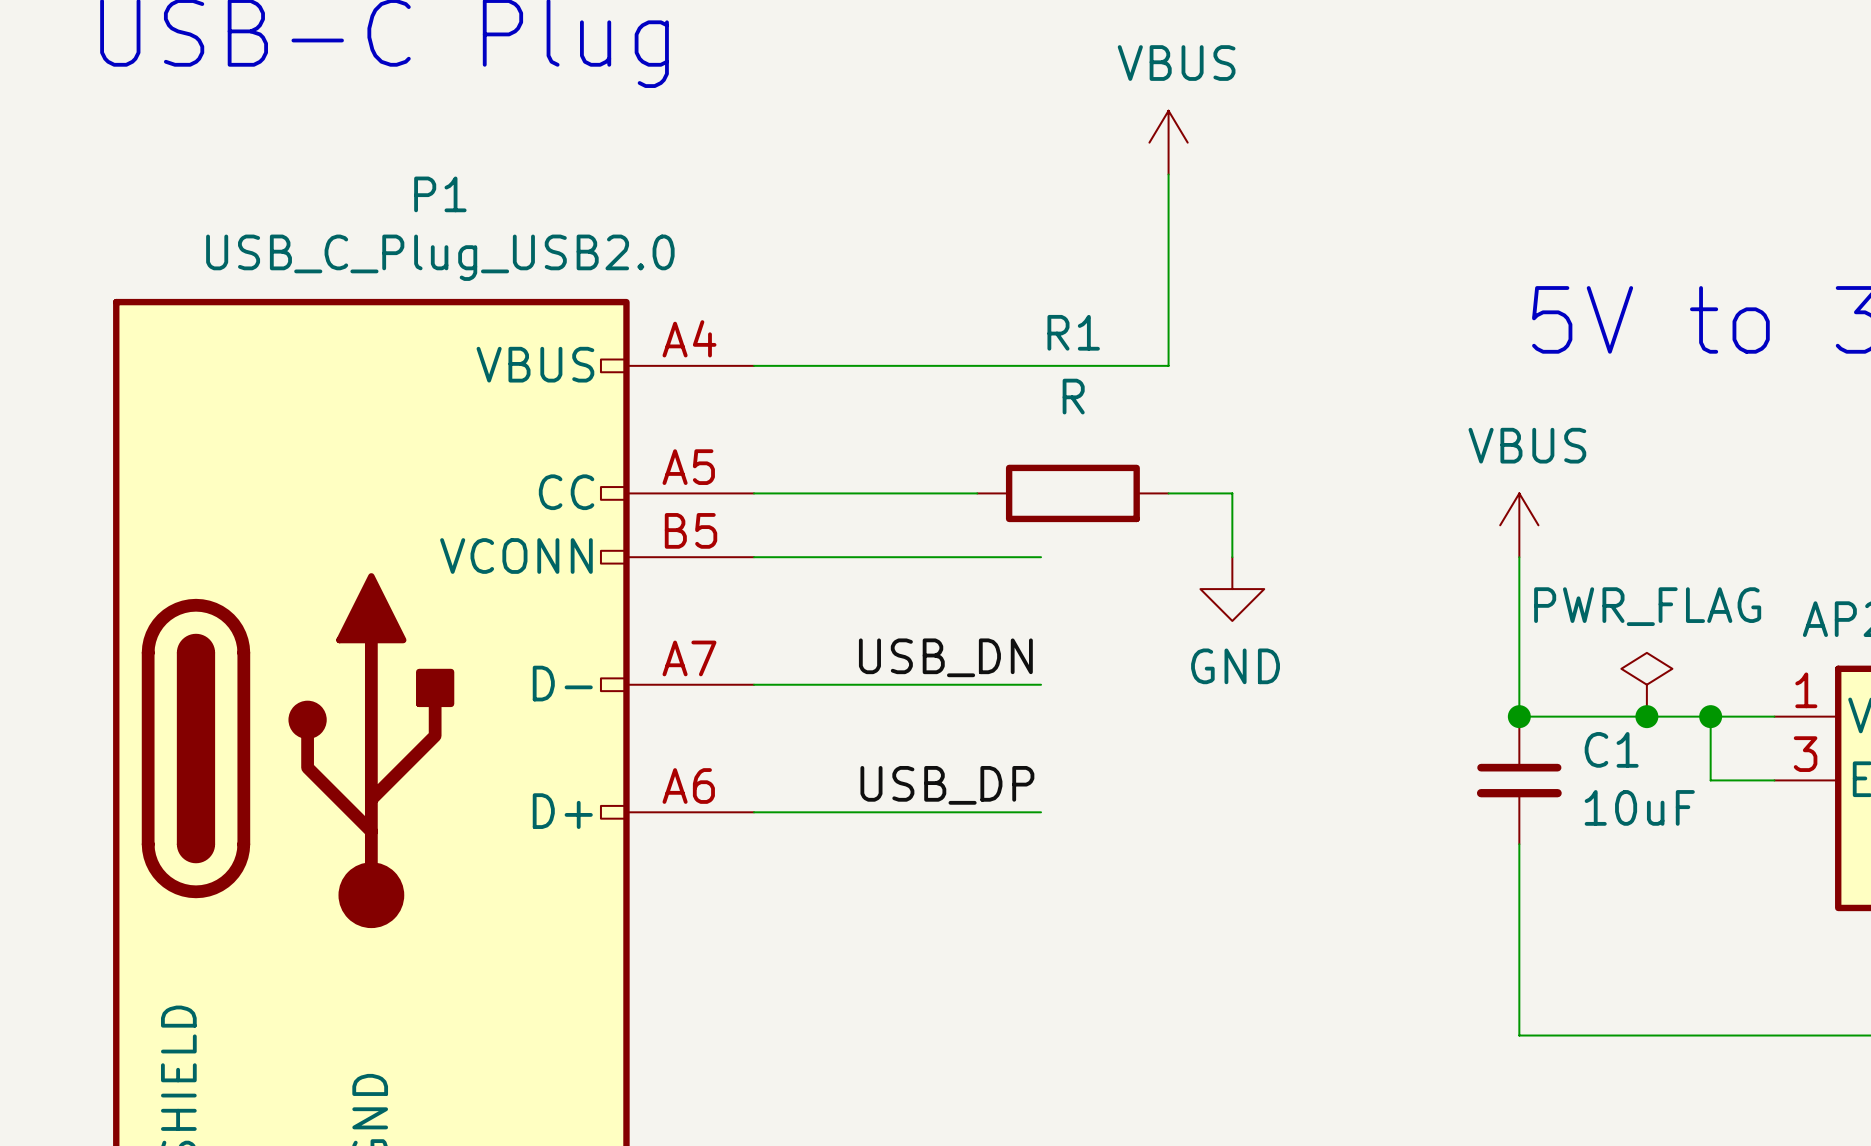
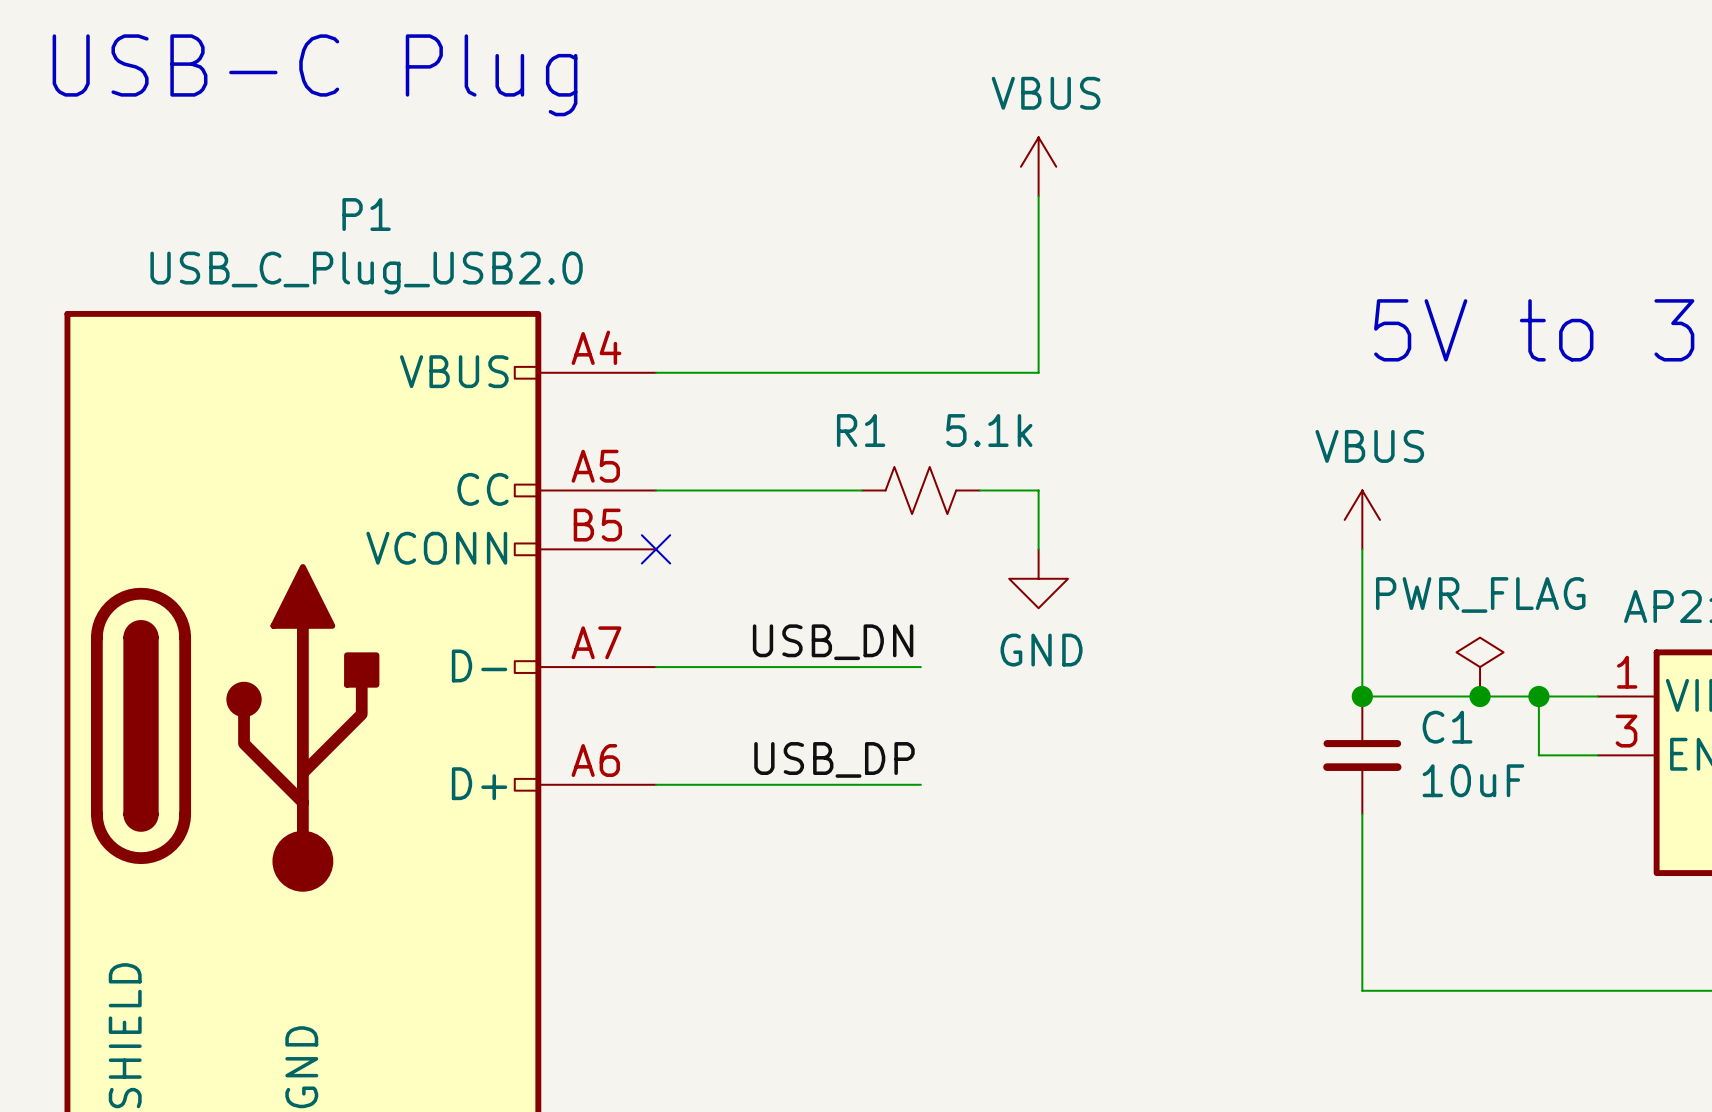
R1 name position: R1 (1073, 332) -> R1 (861, 430)
R1 value: R (1073, 396) -> 5.1k (989, 430)
R1 symbol: [977, 464, 1169, 523] -> [862, 466, 980, 515]
wire: (1168, 493) (1232, 493) (1232, 557) -> (979, 490) (1038, 490) (1038, 549)
wire: (754, 557) (1041, 557) -> none
no-connect mark: none -> (656, 549)
power symbol position: GND (1232, 589) -> GND (1038, 578)

